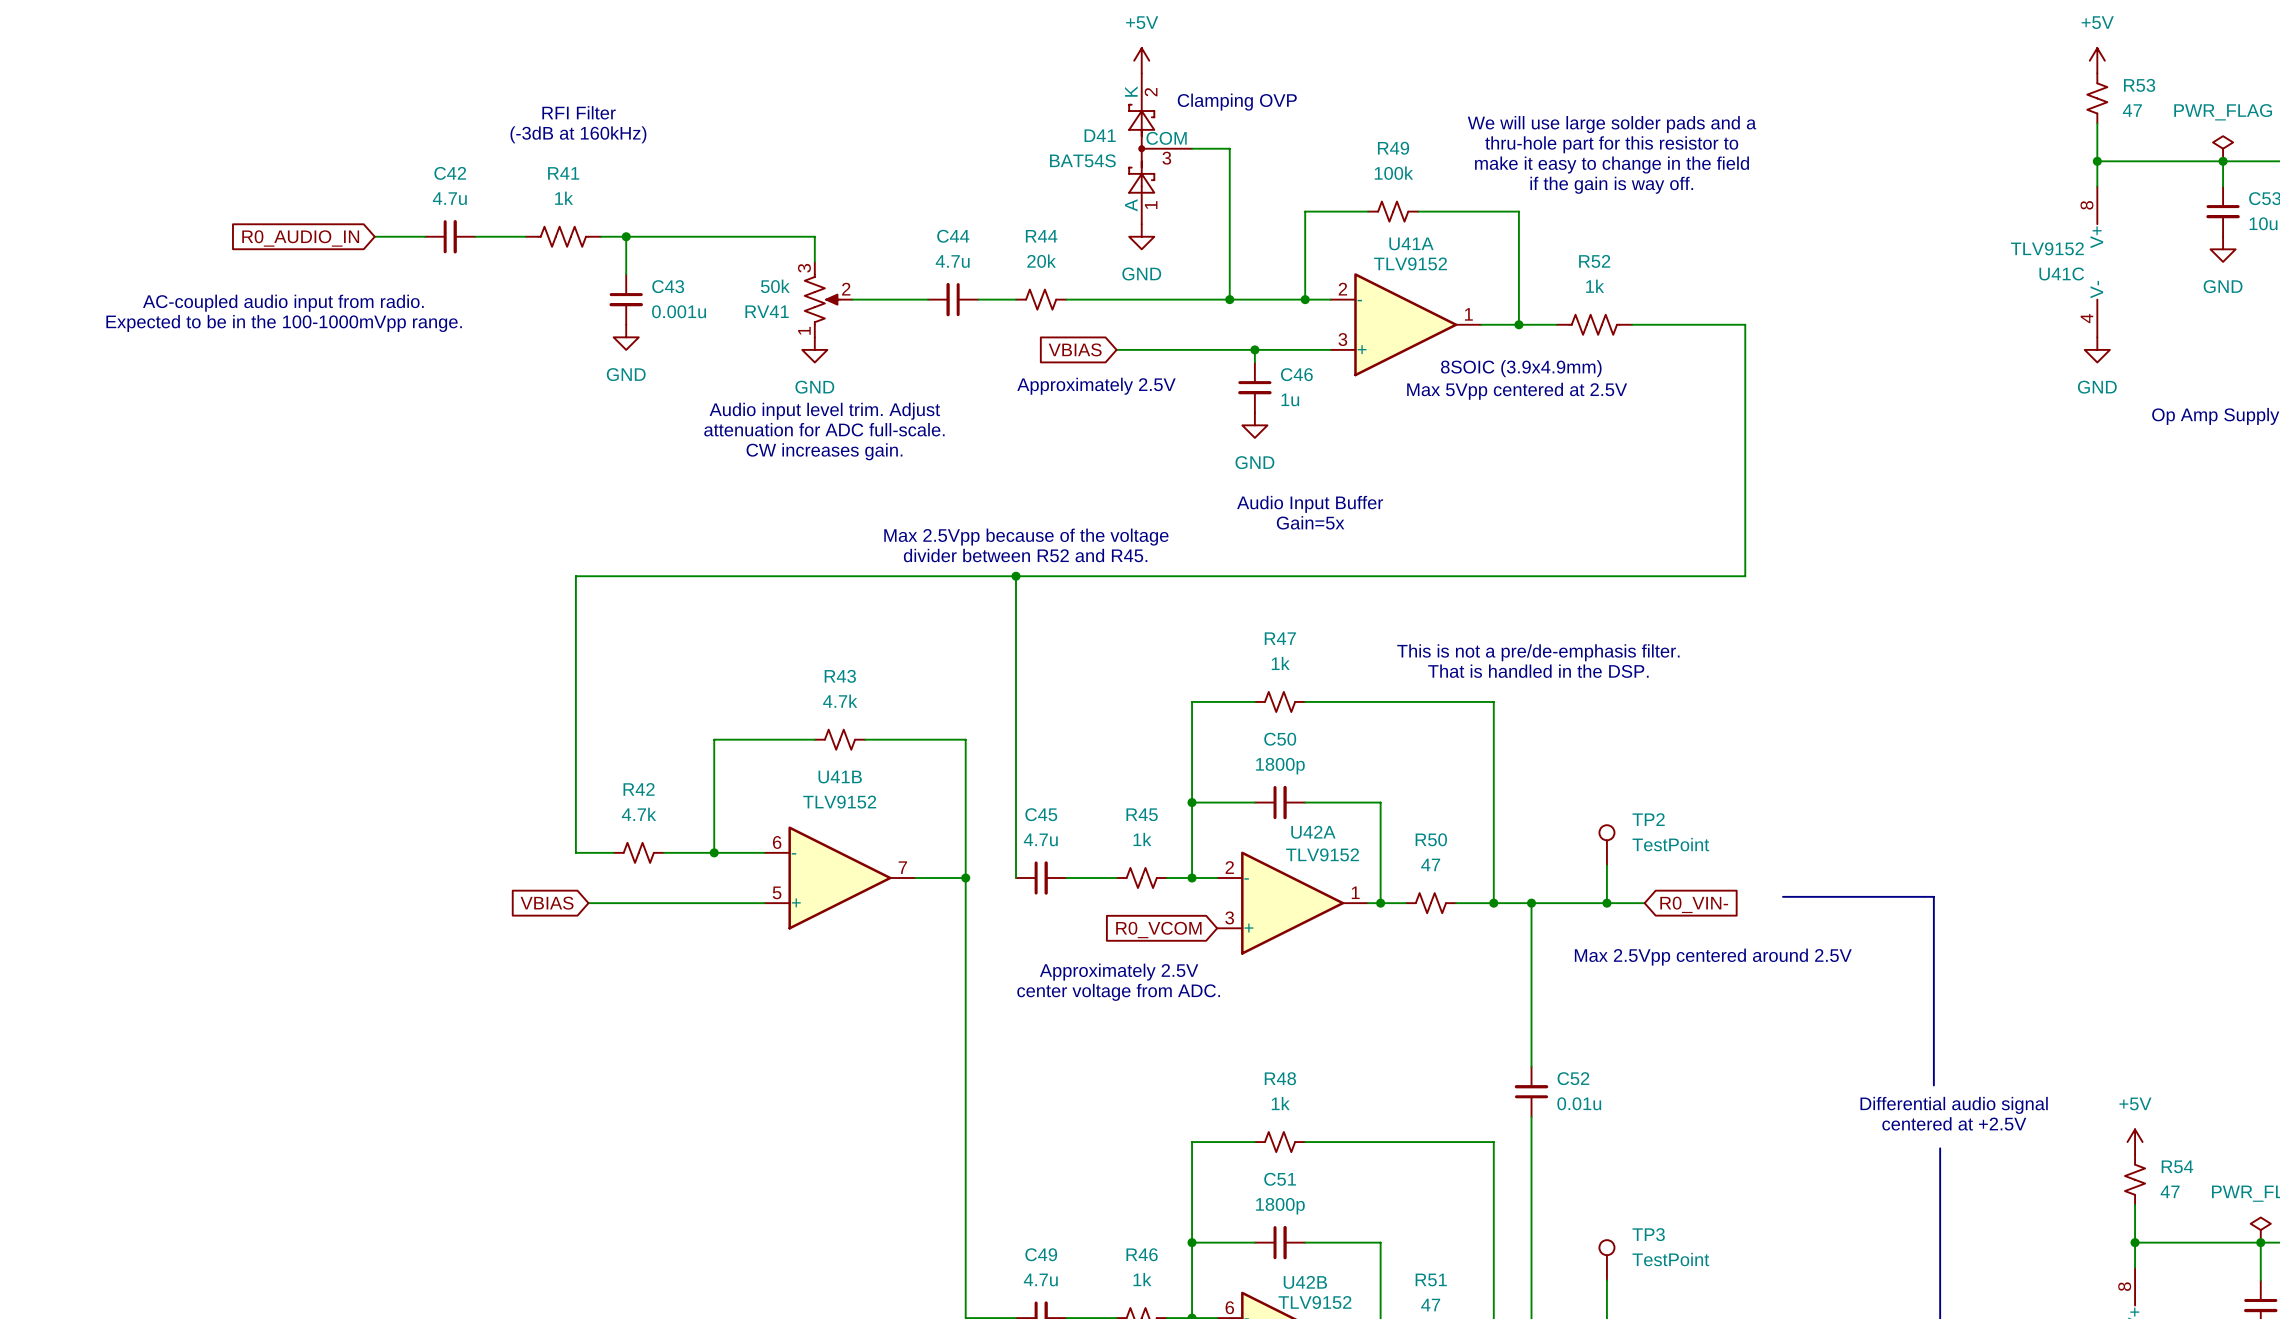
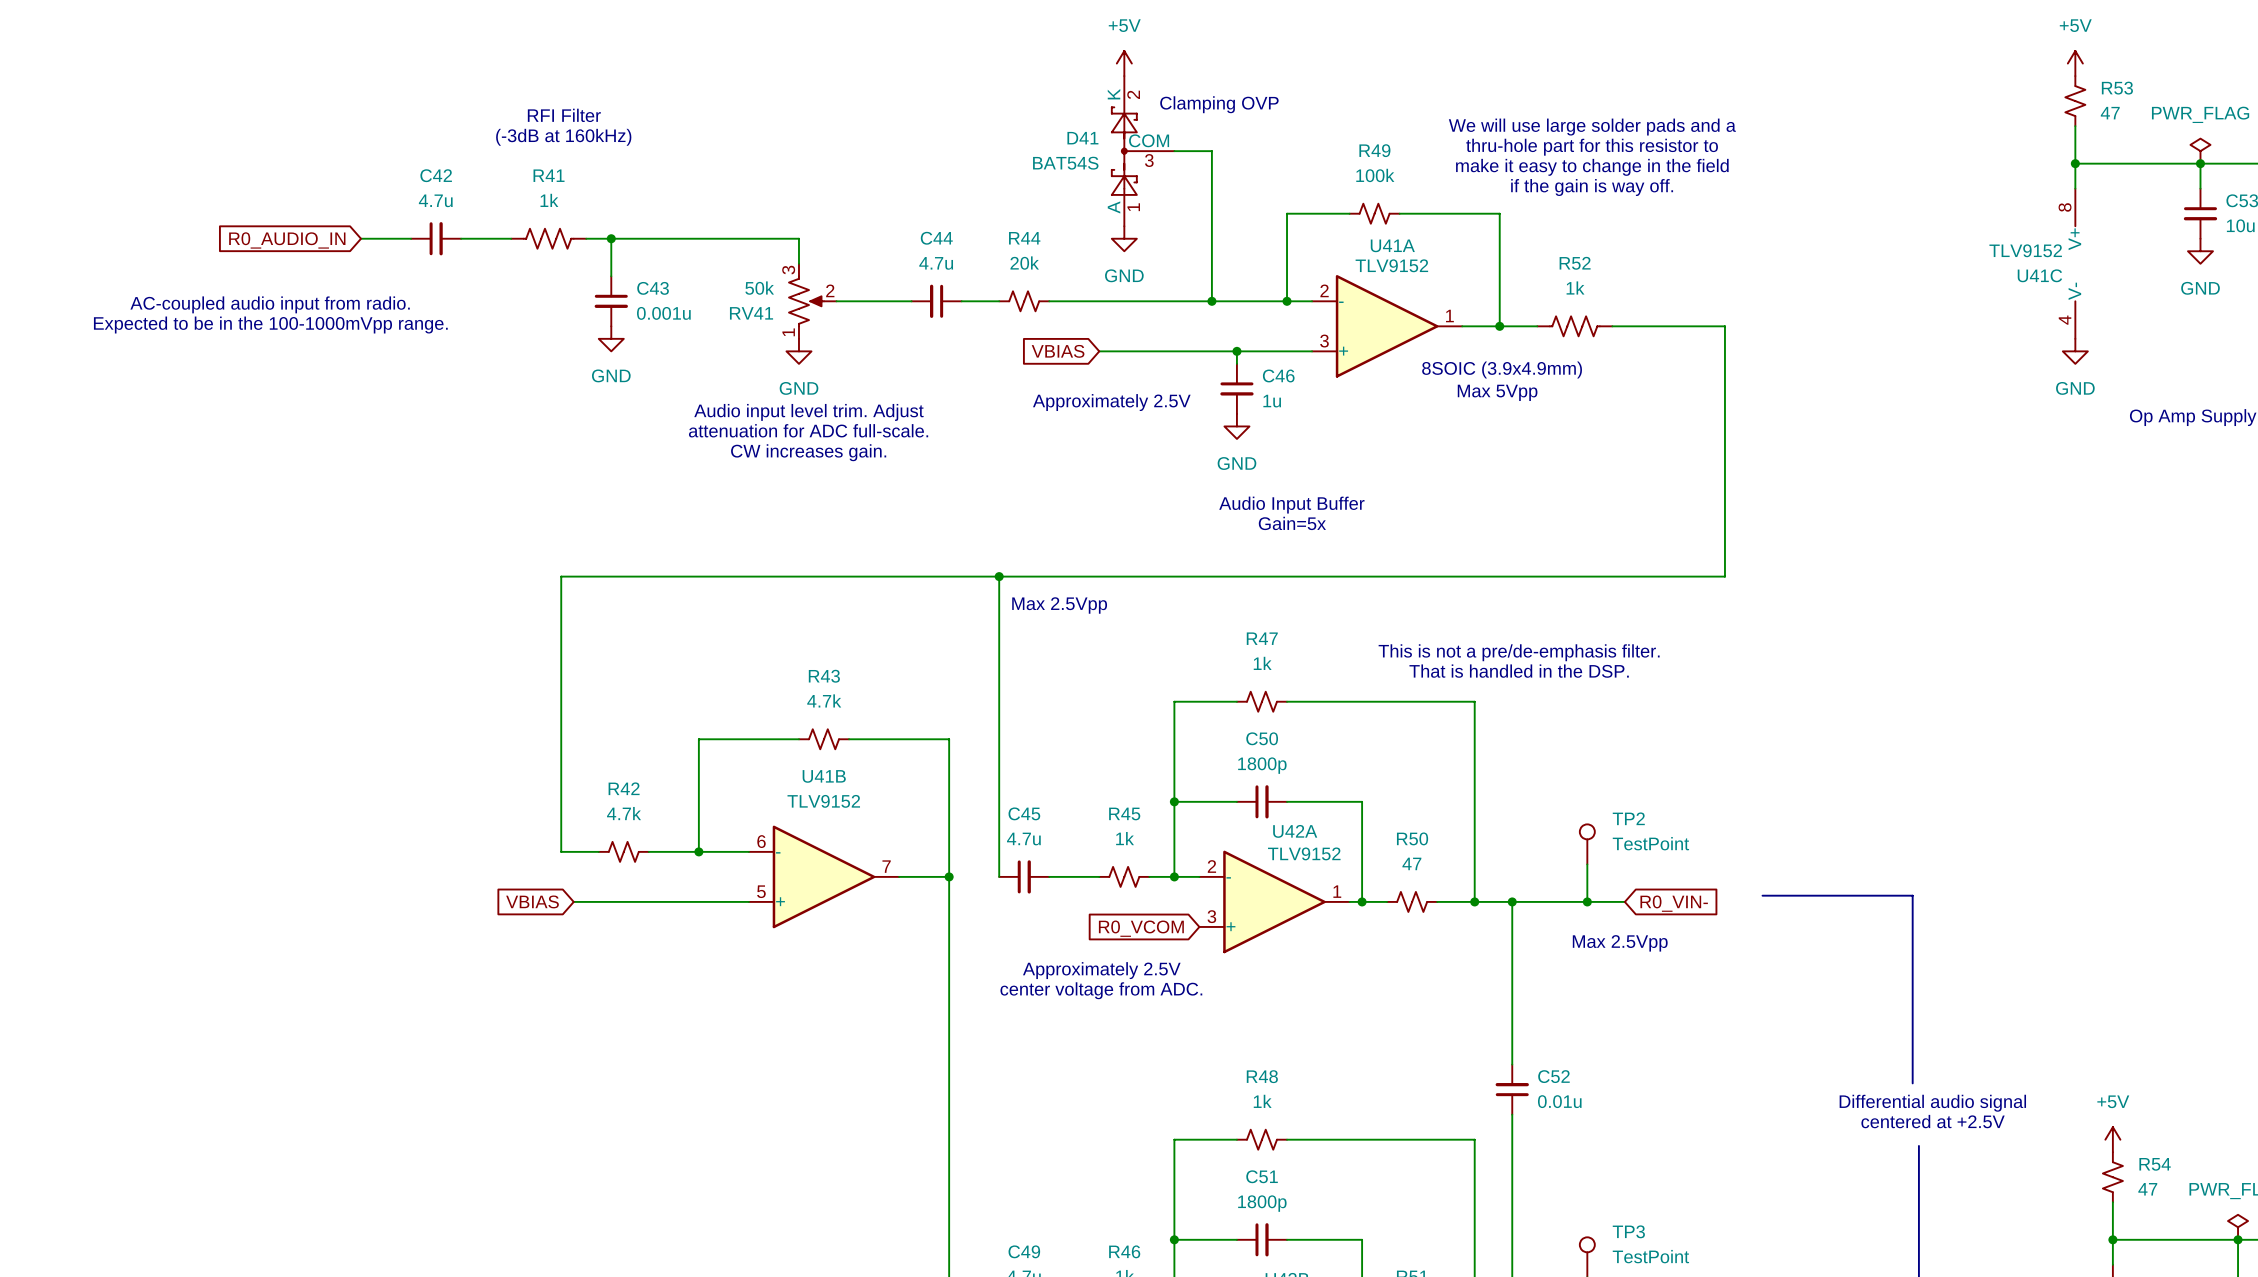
text position: Approximately 2.5V (1096, 386) -> Approximately 2.5V (1111, 402)
text: Max 5Vpp centered at 2.5V (1517, 391) -> Max 5Vpp (1497, 392)
text: Max 2.5Vpp because of the voltage (1026, 537) -> none
text: divider between R52 and R45. (1025, 555) -> none
text: none -> Max 2.5Vpp (1059, 605)
text: none -> Max 2.5Vpp (1620, 943)
text: Max 2.5Vpp centered around 2.5V (1713, 957) -> none

